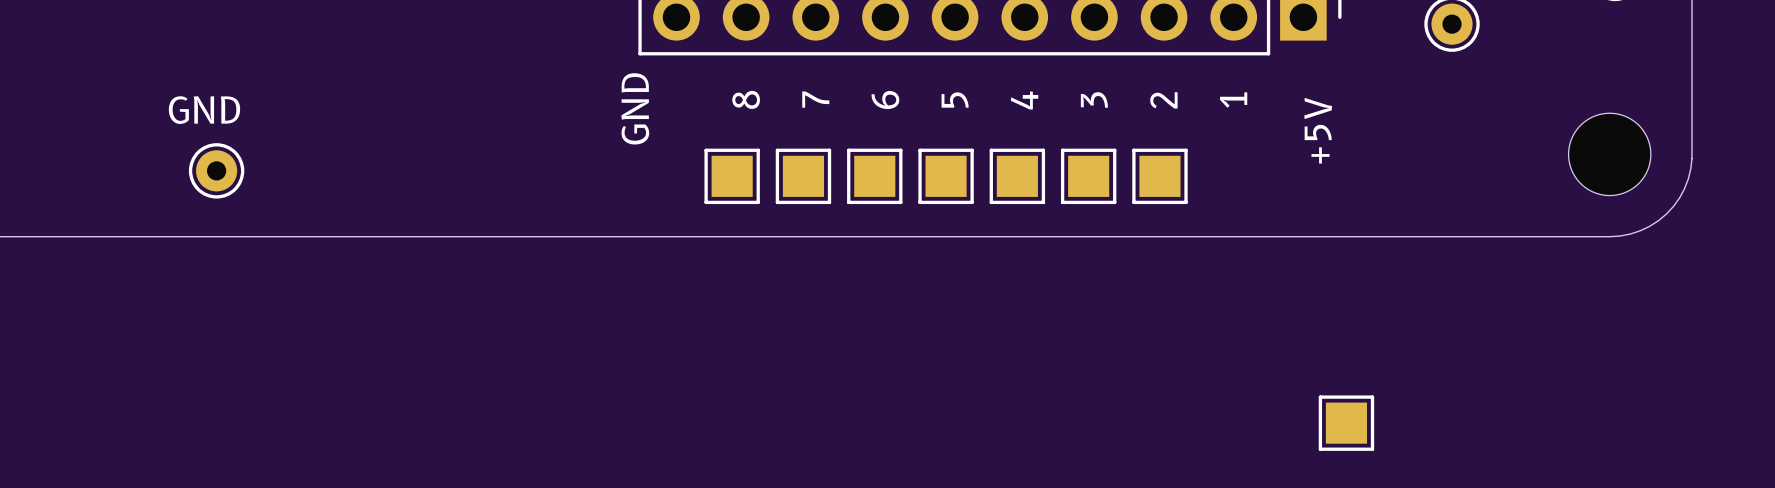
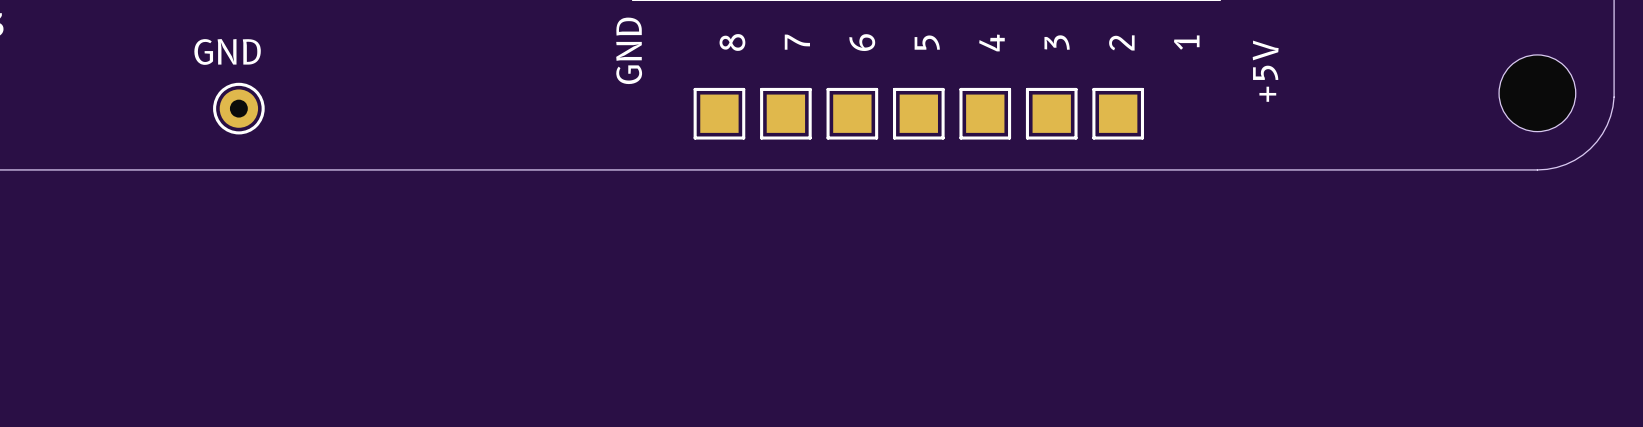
part: (1346, 423) -> none

